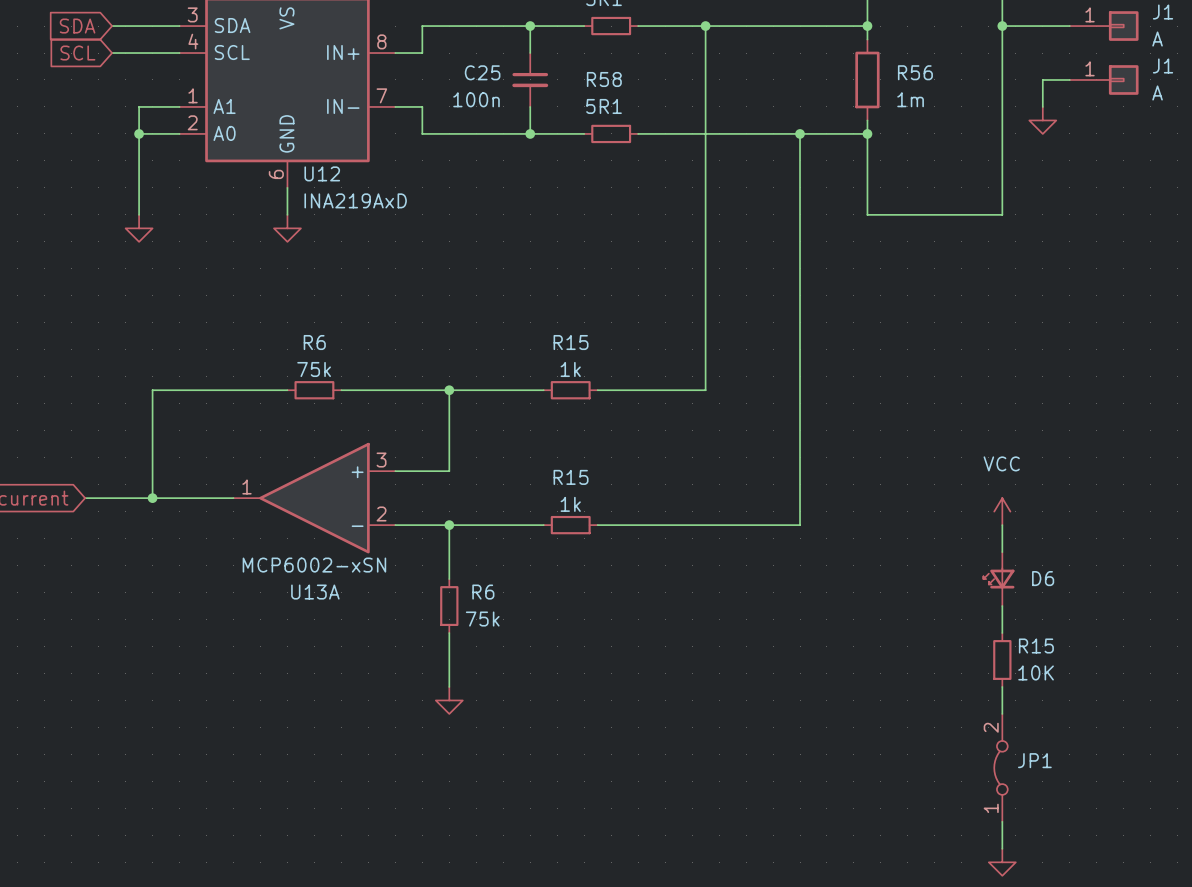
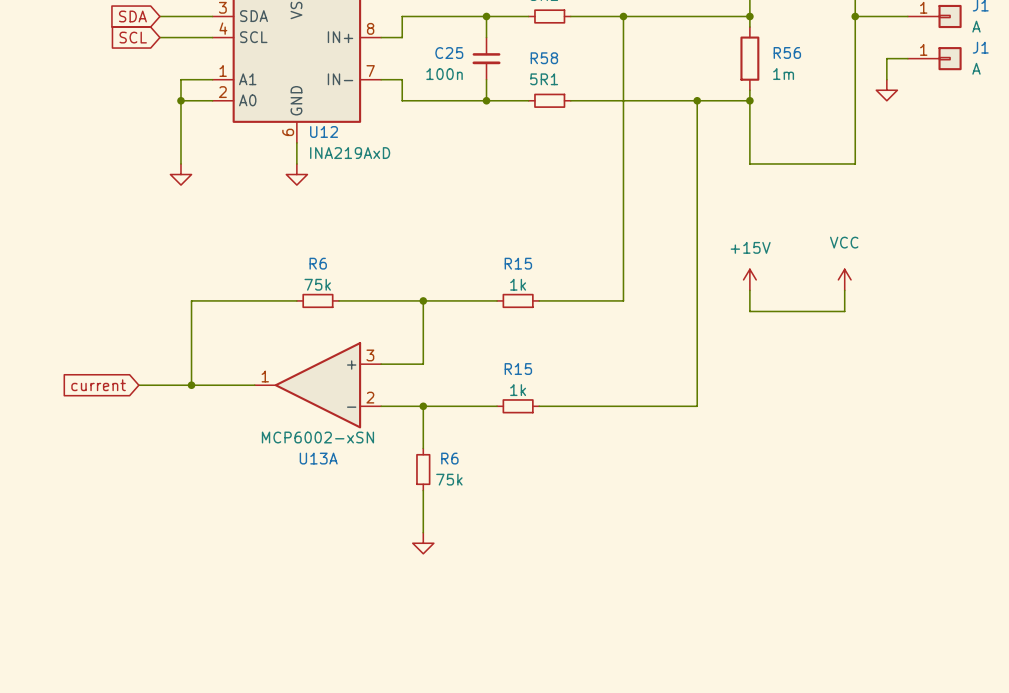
power symbol: none -> +15V (749, 279)
wire: none -> (749, 290) (749, 311) (844, 311) (844, 290)
power symbol position: VCC (1002, 511) -> VCC (844, 279)
wire: (1002, 525) (1002, 552) -> none
D6: (998, 579) -> none
wire: (1002, 606) (1002, 633) -> none
R15: 10K (1002, 659) -> none
wire: (1002, 686) (1002, 713) -> none
JP1: (1000, 767) -> none
wire: (1002, 821) (1002, 848) -> none
power symbol: (1002, 862) -> none

